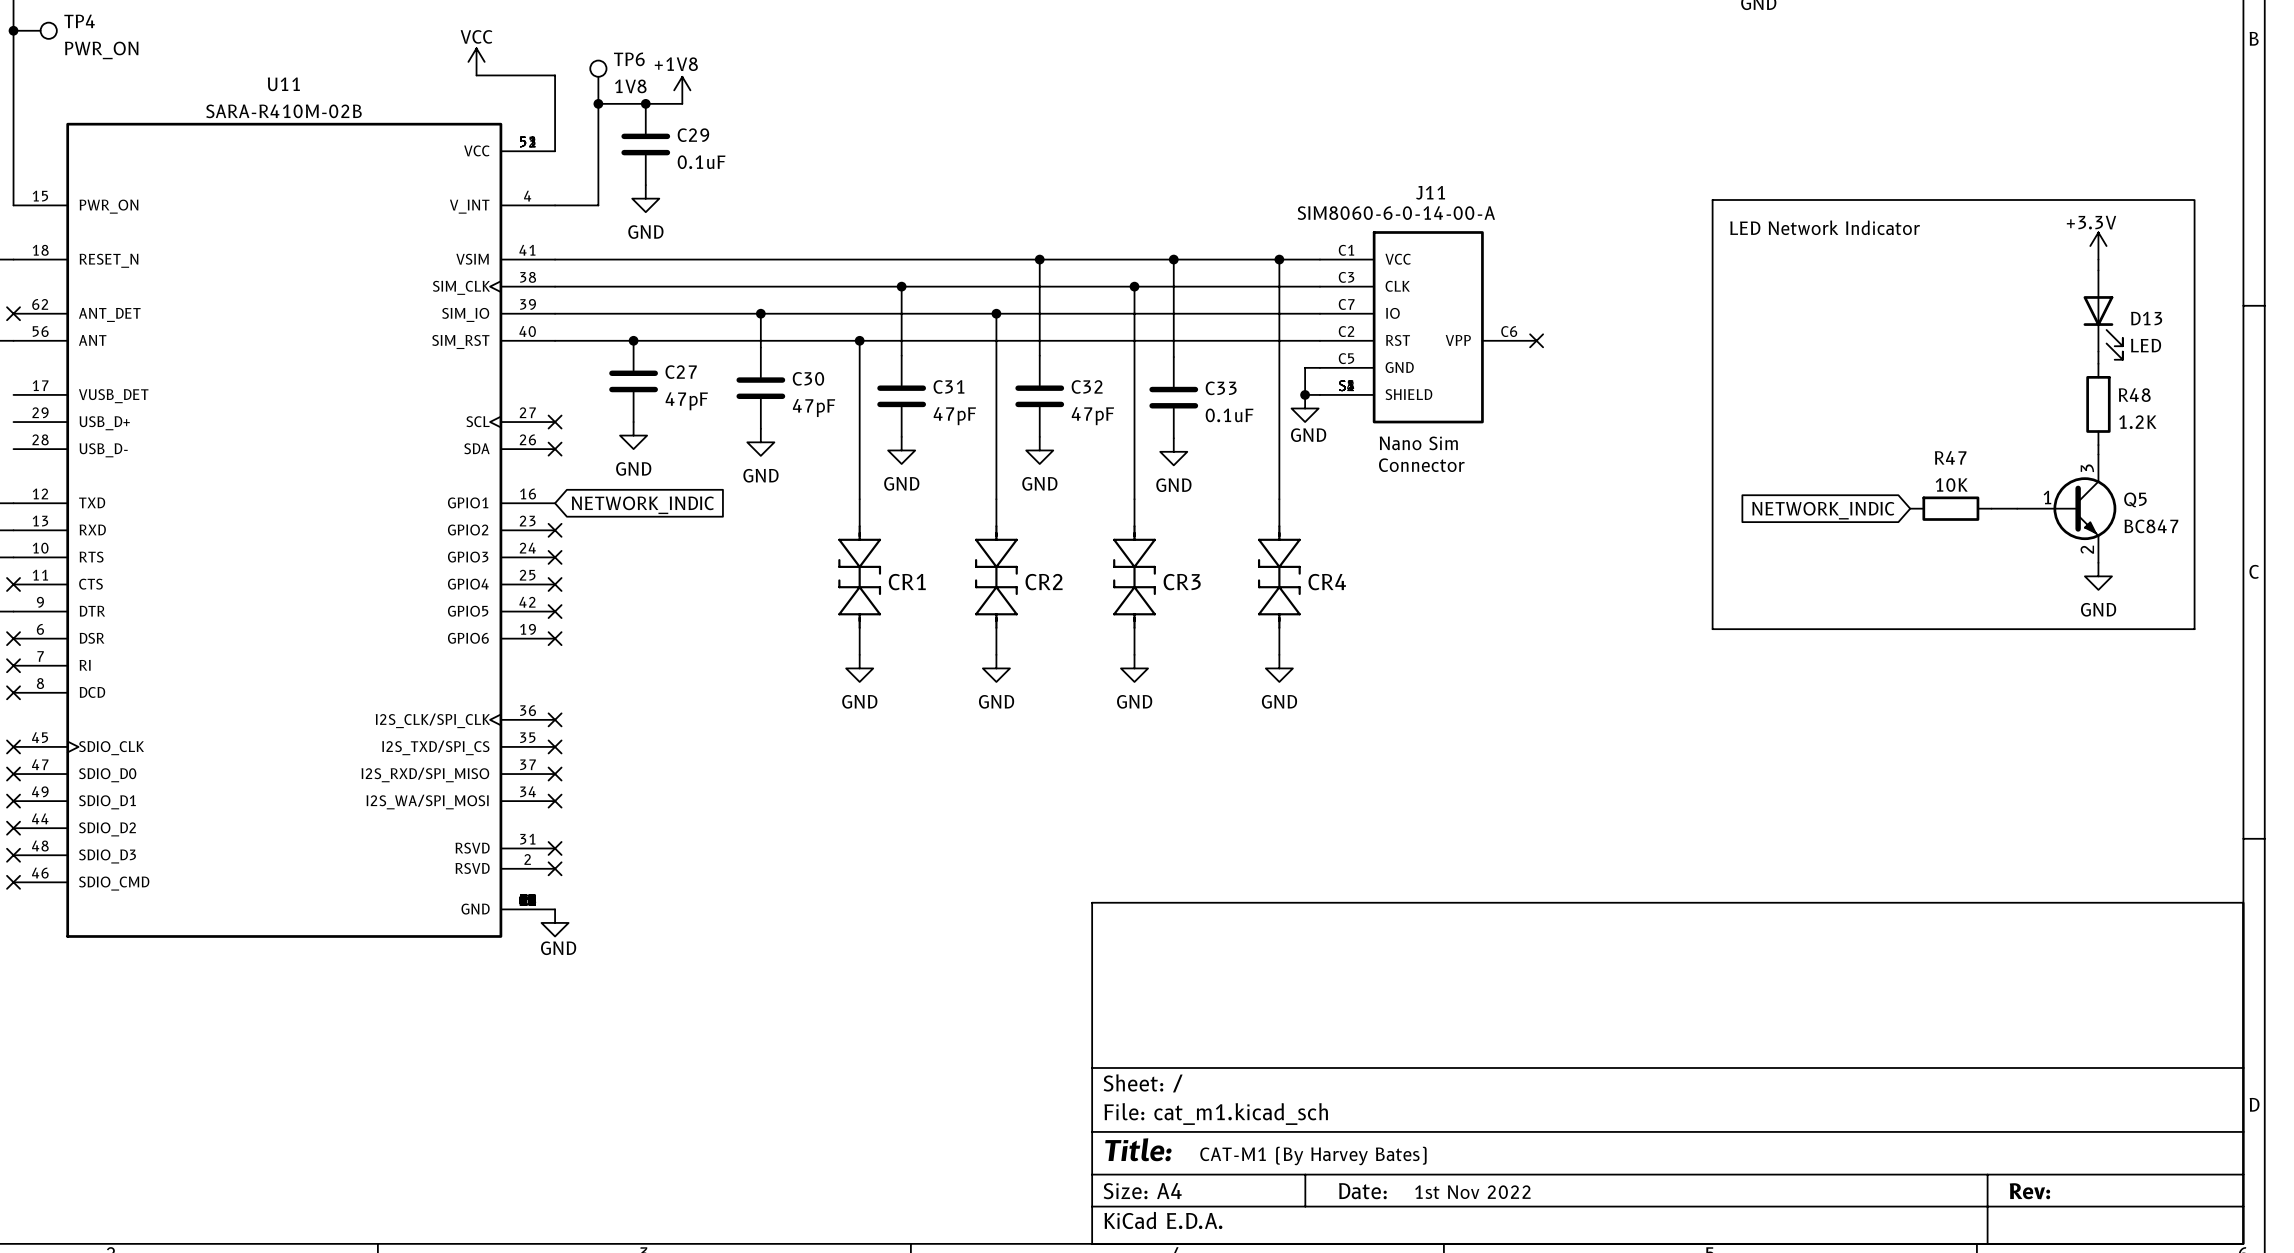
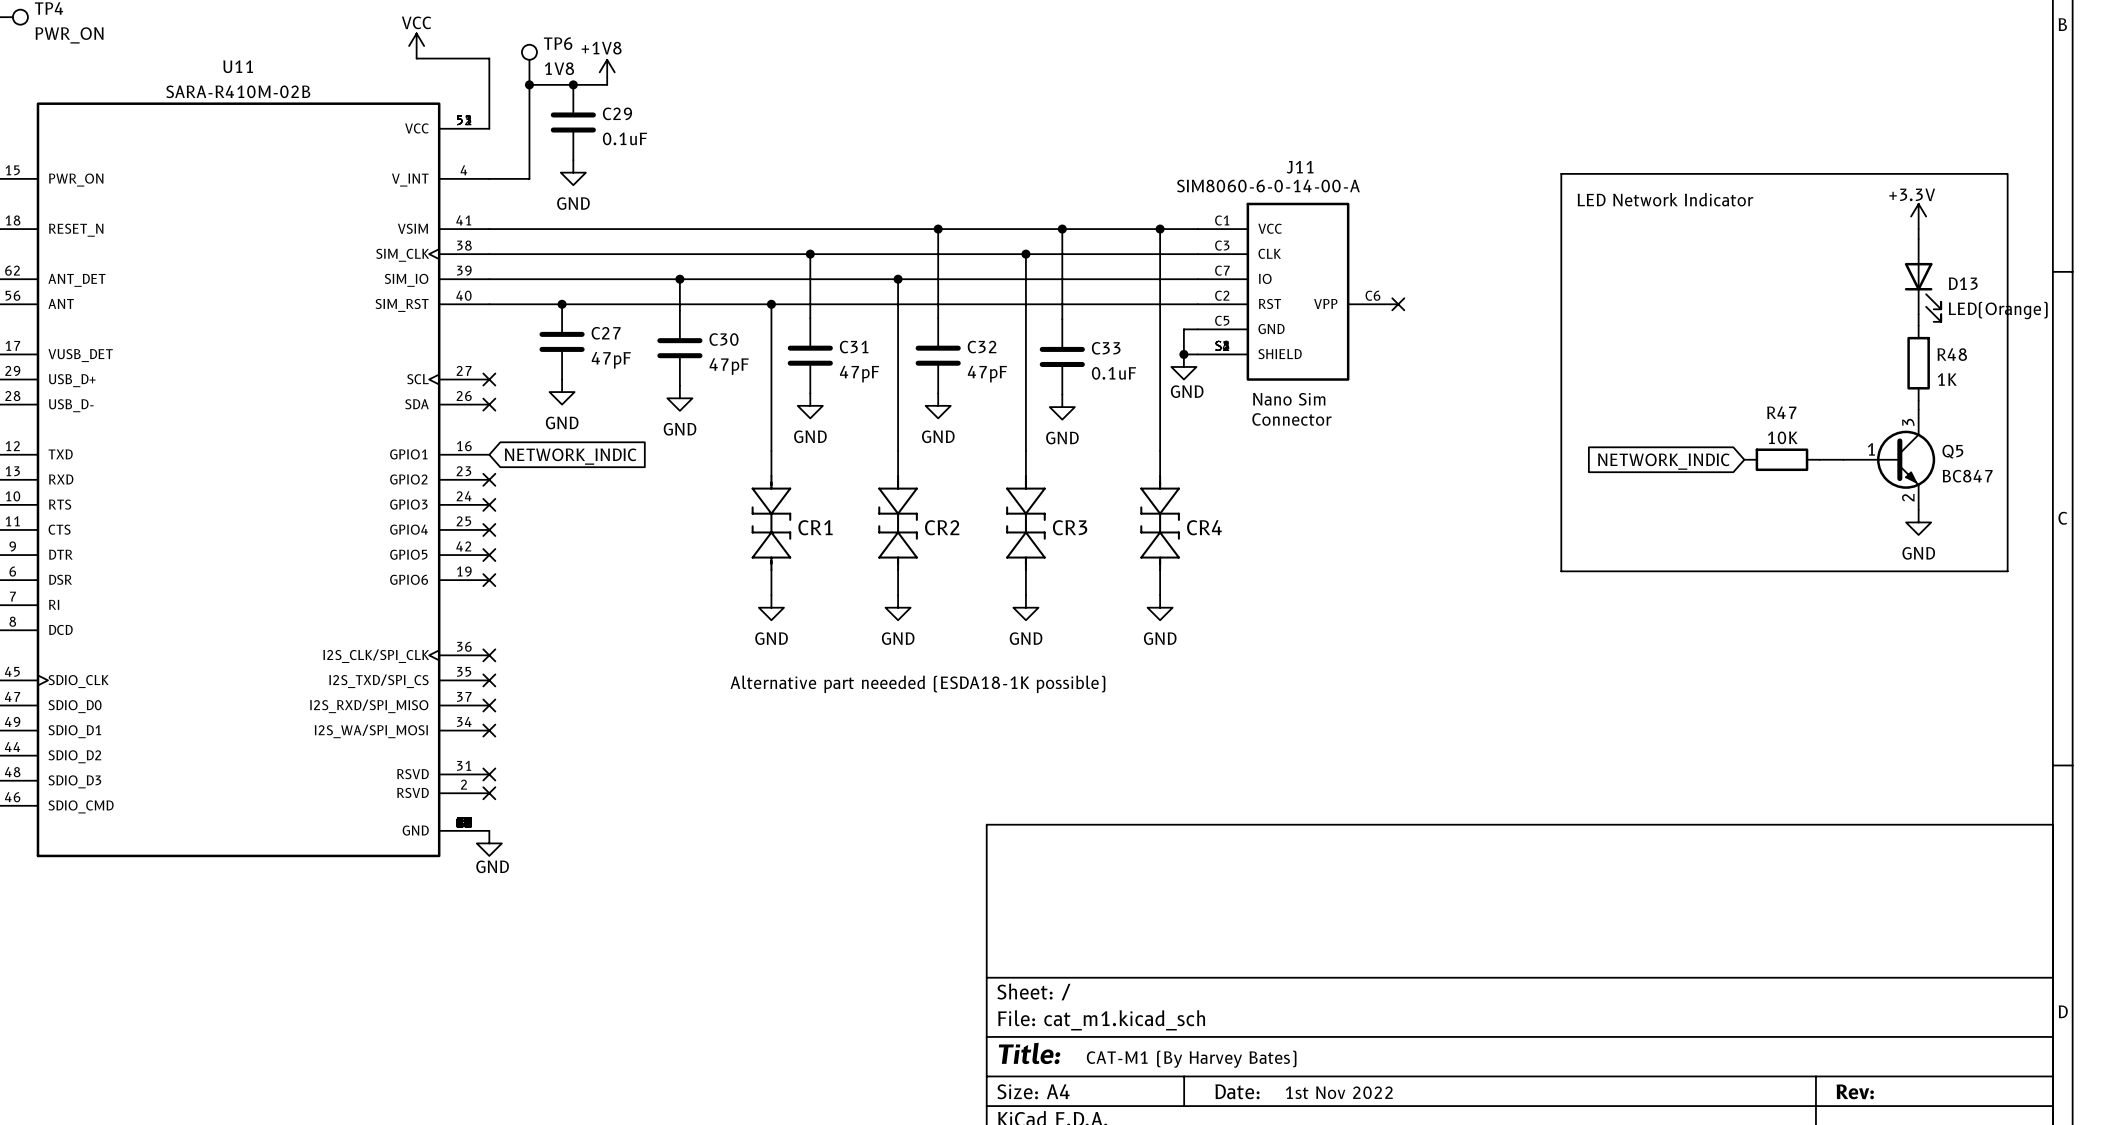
D13 value: LED (2146, 345) -> LED(Orange) (1998, 310)
R48 value: 1.2K (2137, 422) -> 1K (1947, 379)
text: none -> Alternative part neeeded (ESDA18-1K possible) (917, 684)

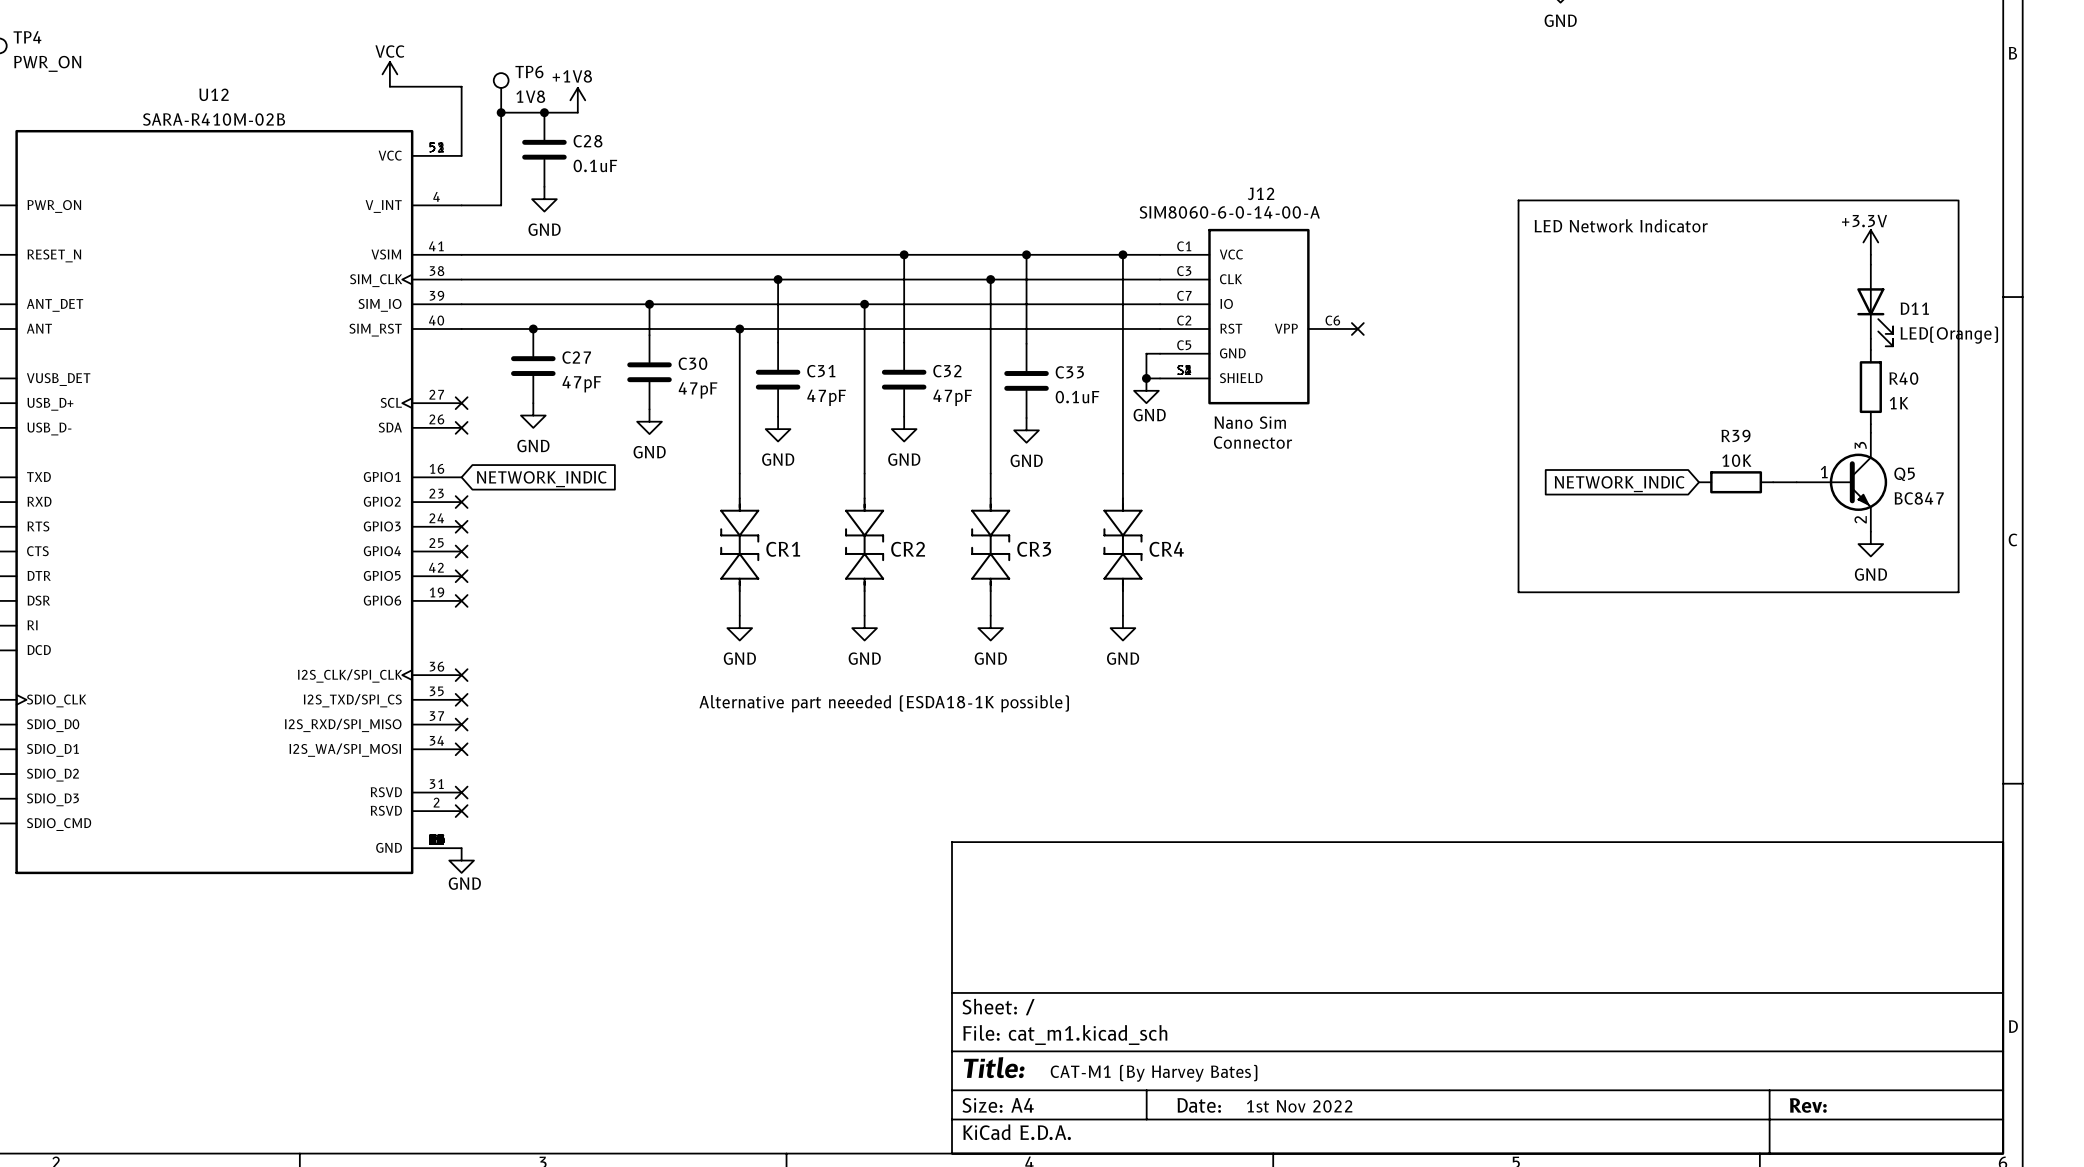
U11 name: U11 (238, 66) -> U12 (214, 94)
C29 name: C29 (617, 113) -> C28 (588, 141)
J11 name: J11 (1300, 167) -> J12 (1261, 193)
D13 name: D13 (1963, 283) -> D11 (1914, 308)
R48 name: R48 (1952, 354) -> R40 (1903, 378)
R47 name: R47 (1781, 412) -> R39 (1736, 435)

